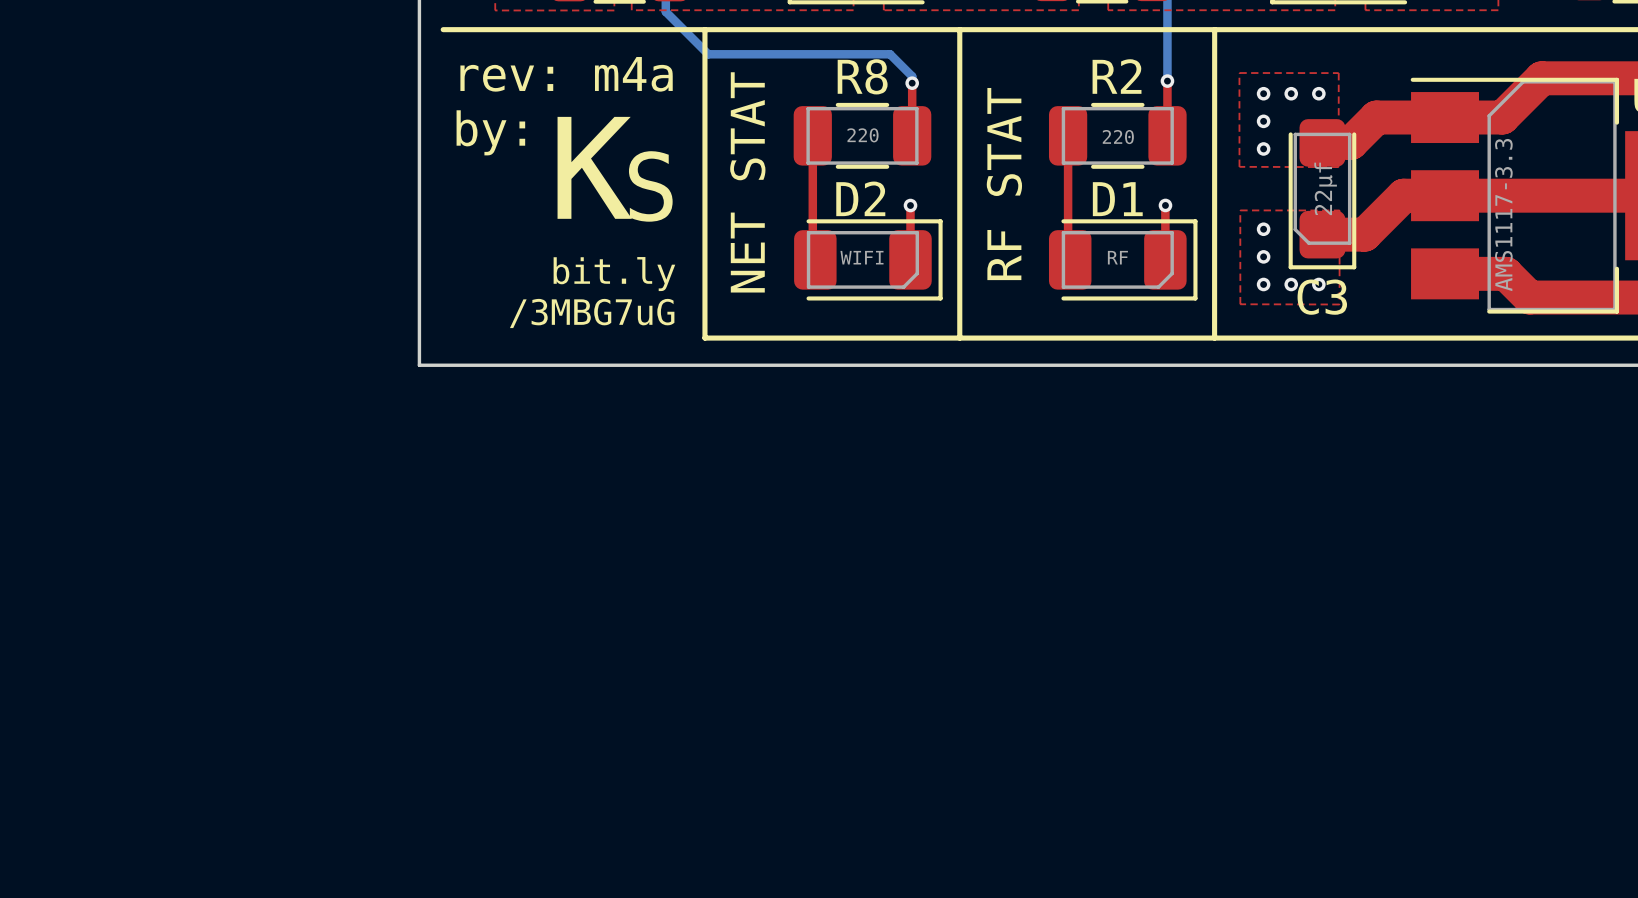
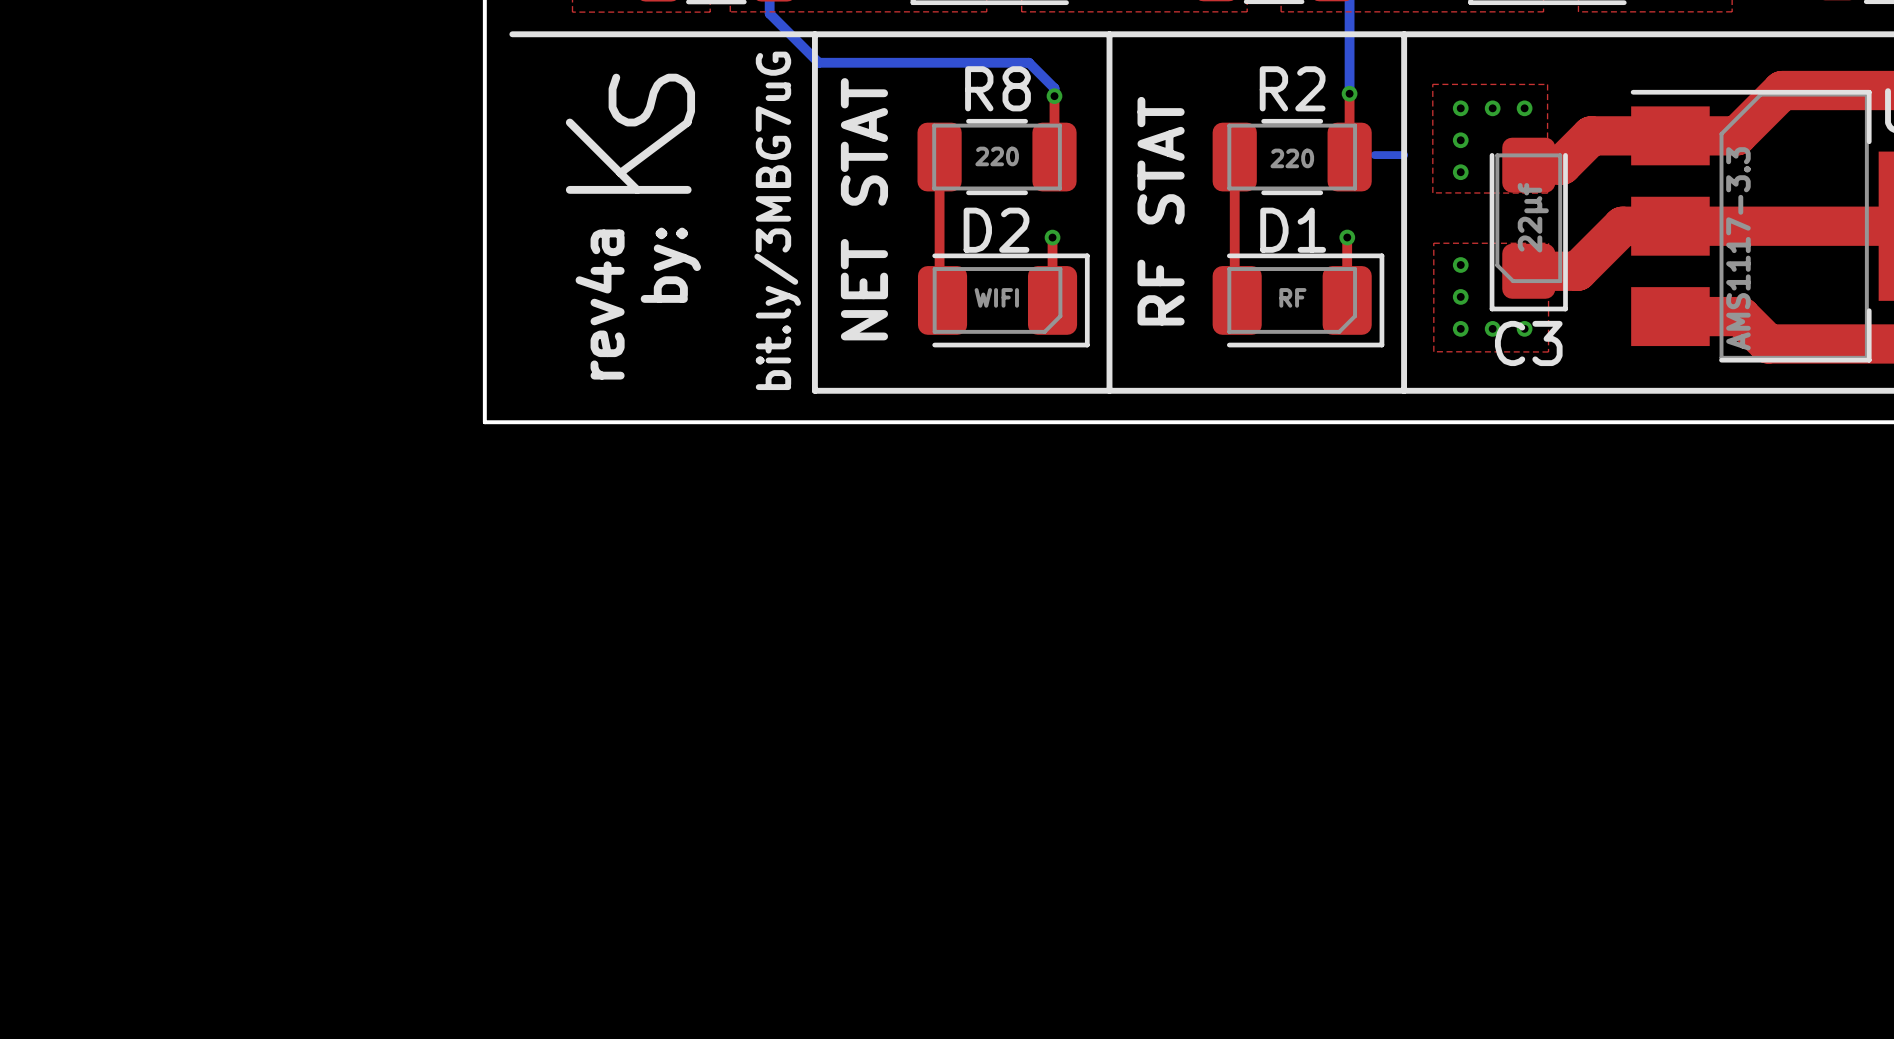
text: rev: m4a (566, 74) -> none
text: by: (490, 132) -> none
text: none -> K (628, 156)
bottom track: none -> (1374, 155) (1404, 155)
text: K (594, 167) -> by: (670, 265)
text rotation: 0° (650, 186) -> 90° counterclockwise (651, 100)
text: none -> rev4a (600, 304)
text: bit.ly (614, 274) -> none
text: /3MBG7uG (592, 313) -> bit.ly/3MBG7uG (777, 220)

